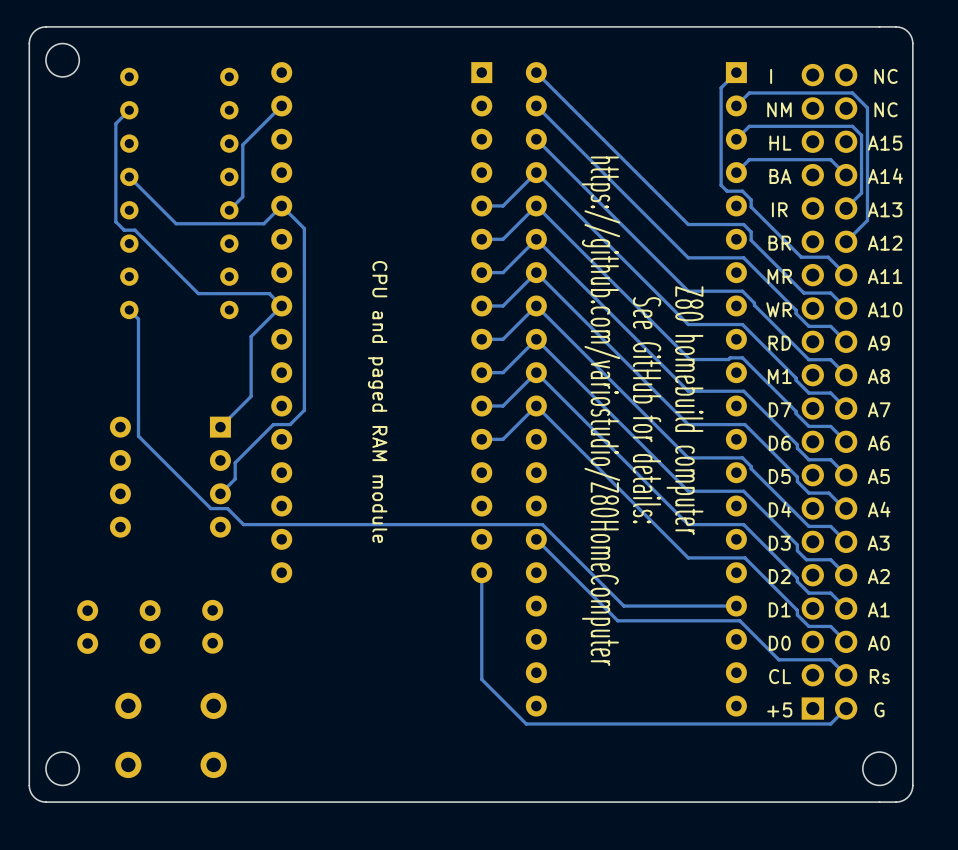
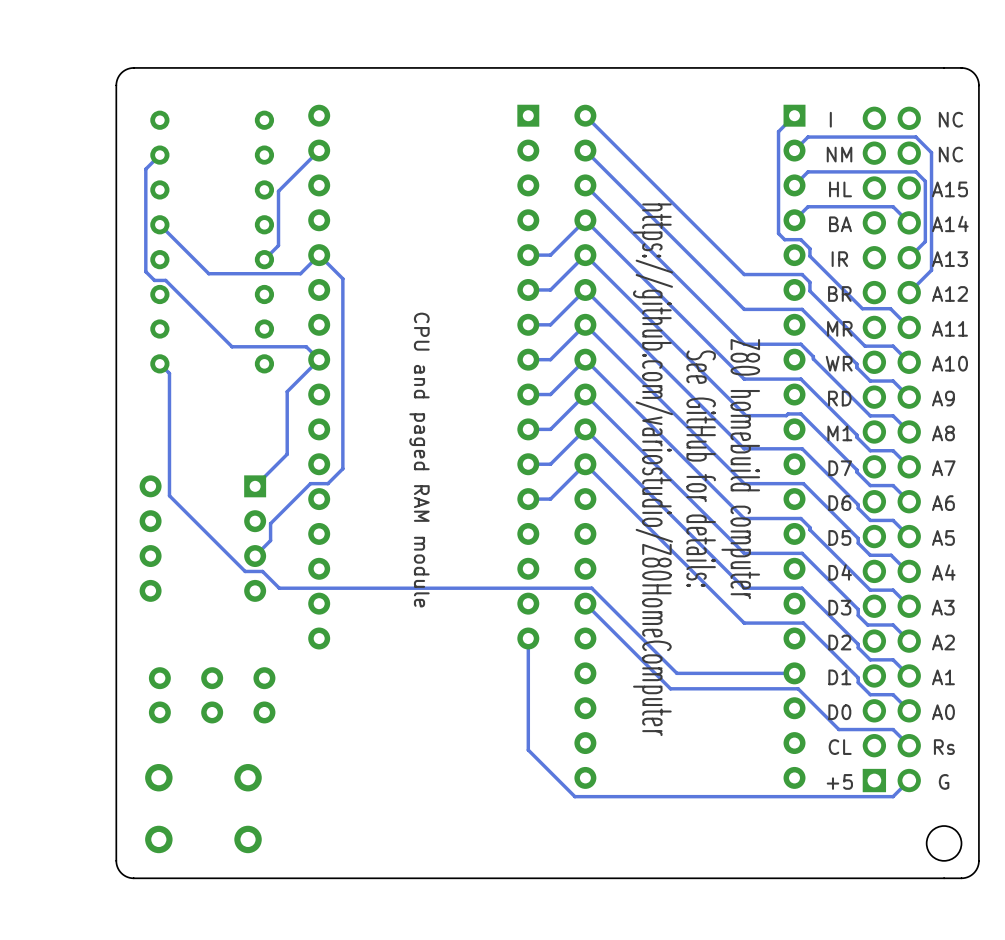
board edge: (104, 26) (42, 27) (32, 33) (29, 43) (29, 787) (32, 795) (42, 801) (104, 802) -> (133, 67) (121, 73) (116, 85) (116, 860) (121, 873) (133, 878)
round board edge: [45, 42, 80, 78] -> none
part: (212, 626) -> none
part: (87, 627) -> none
part: none -> (159, 695)
part: (150, 627) -> none
part: none -> (212, 695)
part: none -> (264, 695)
round board edge: [45, 751, 80, 787] -> none

